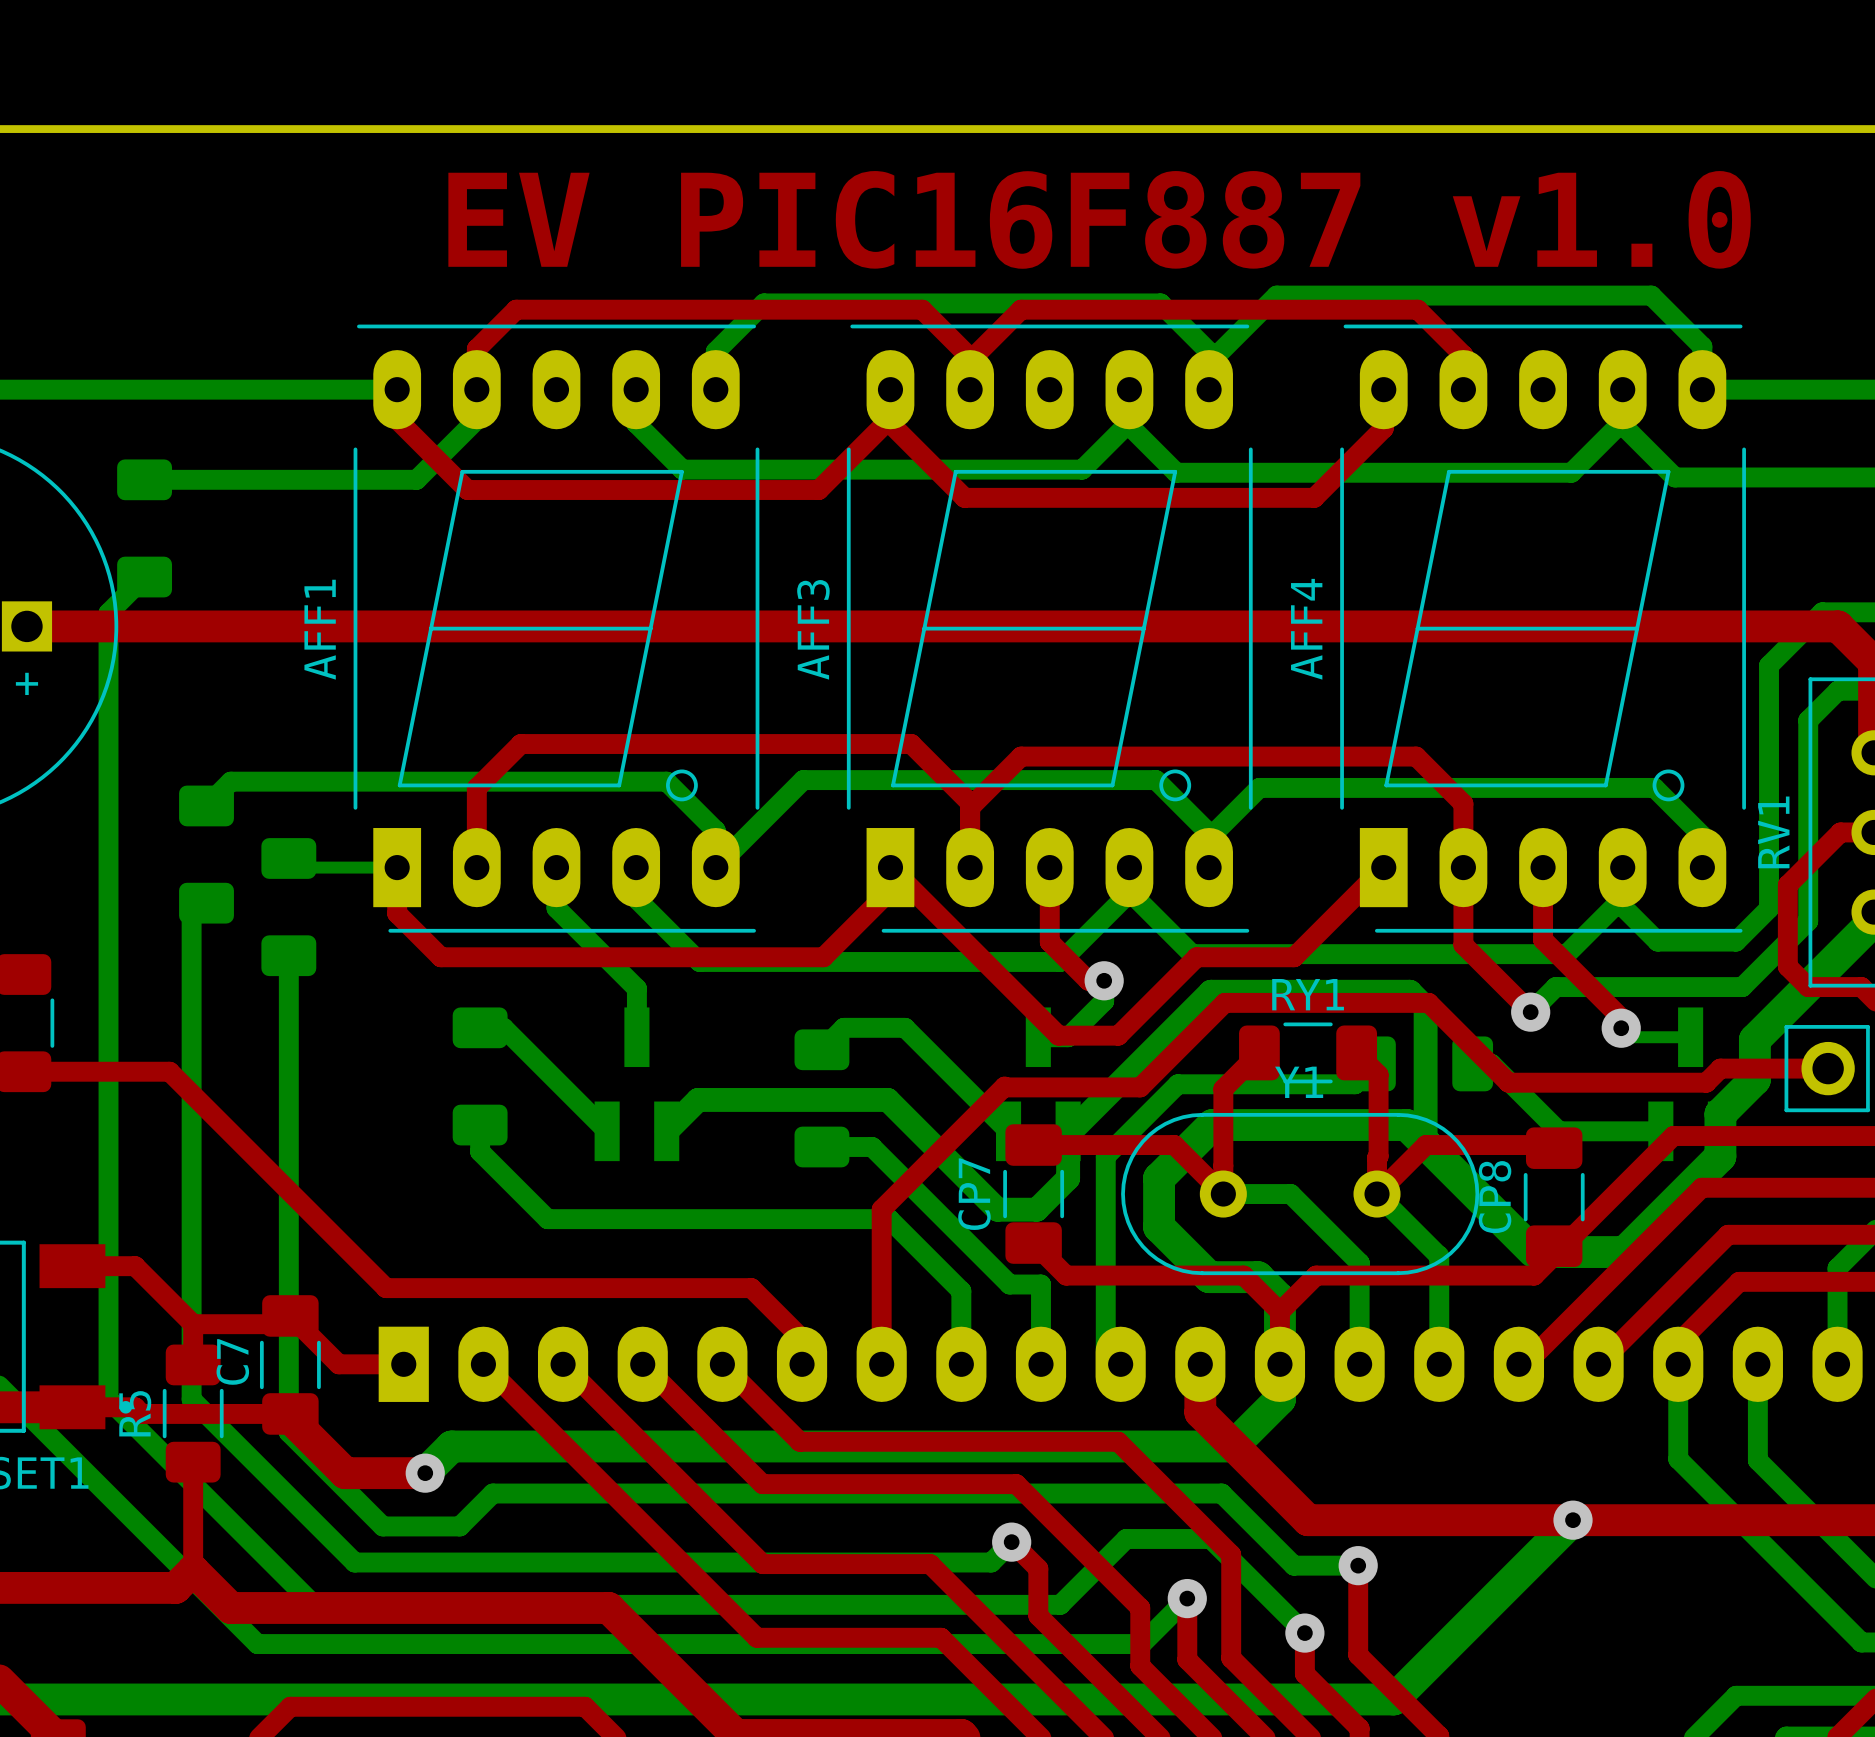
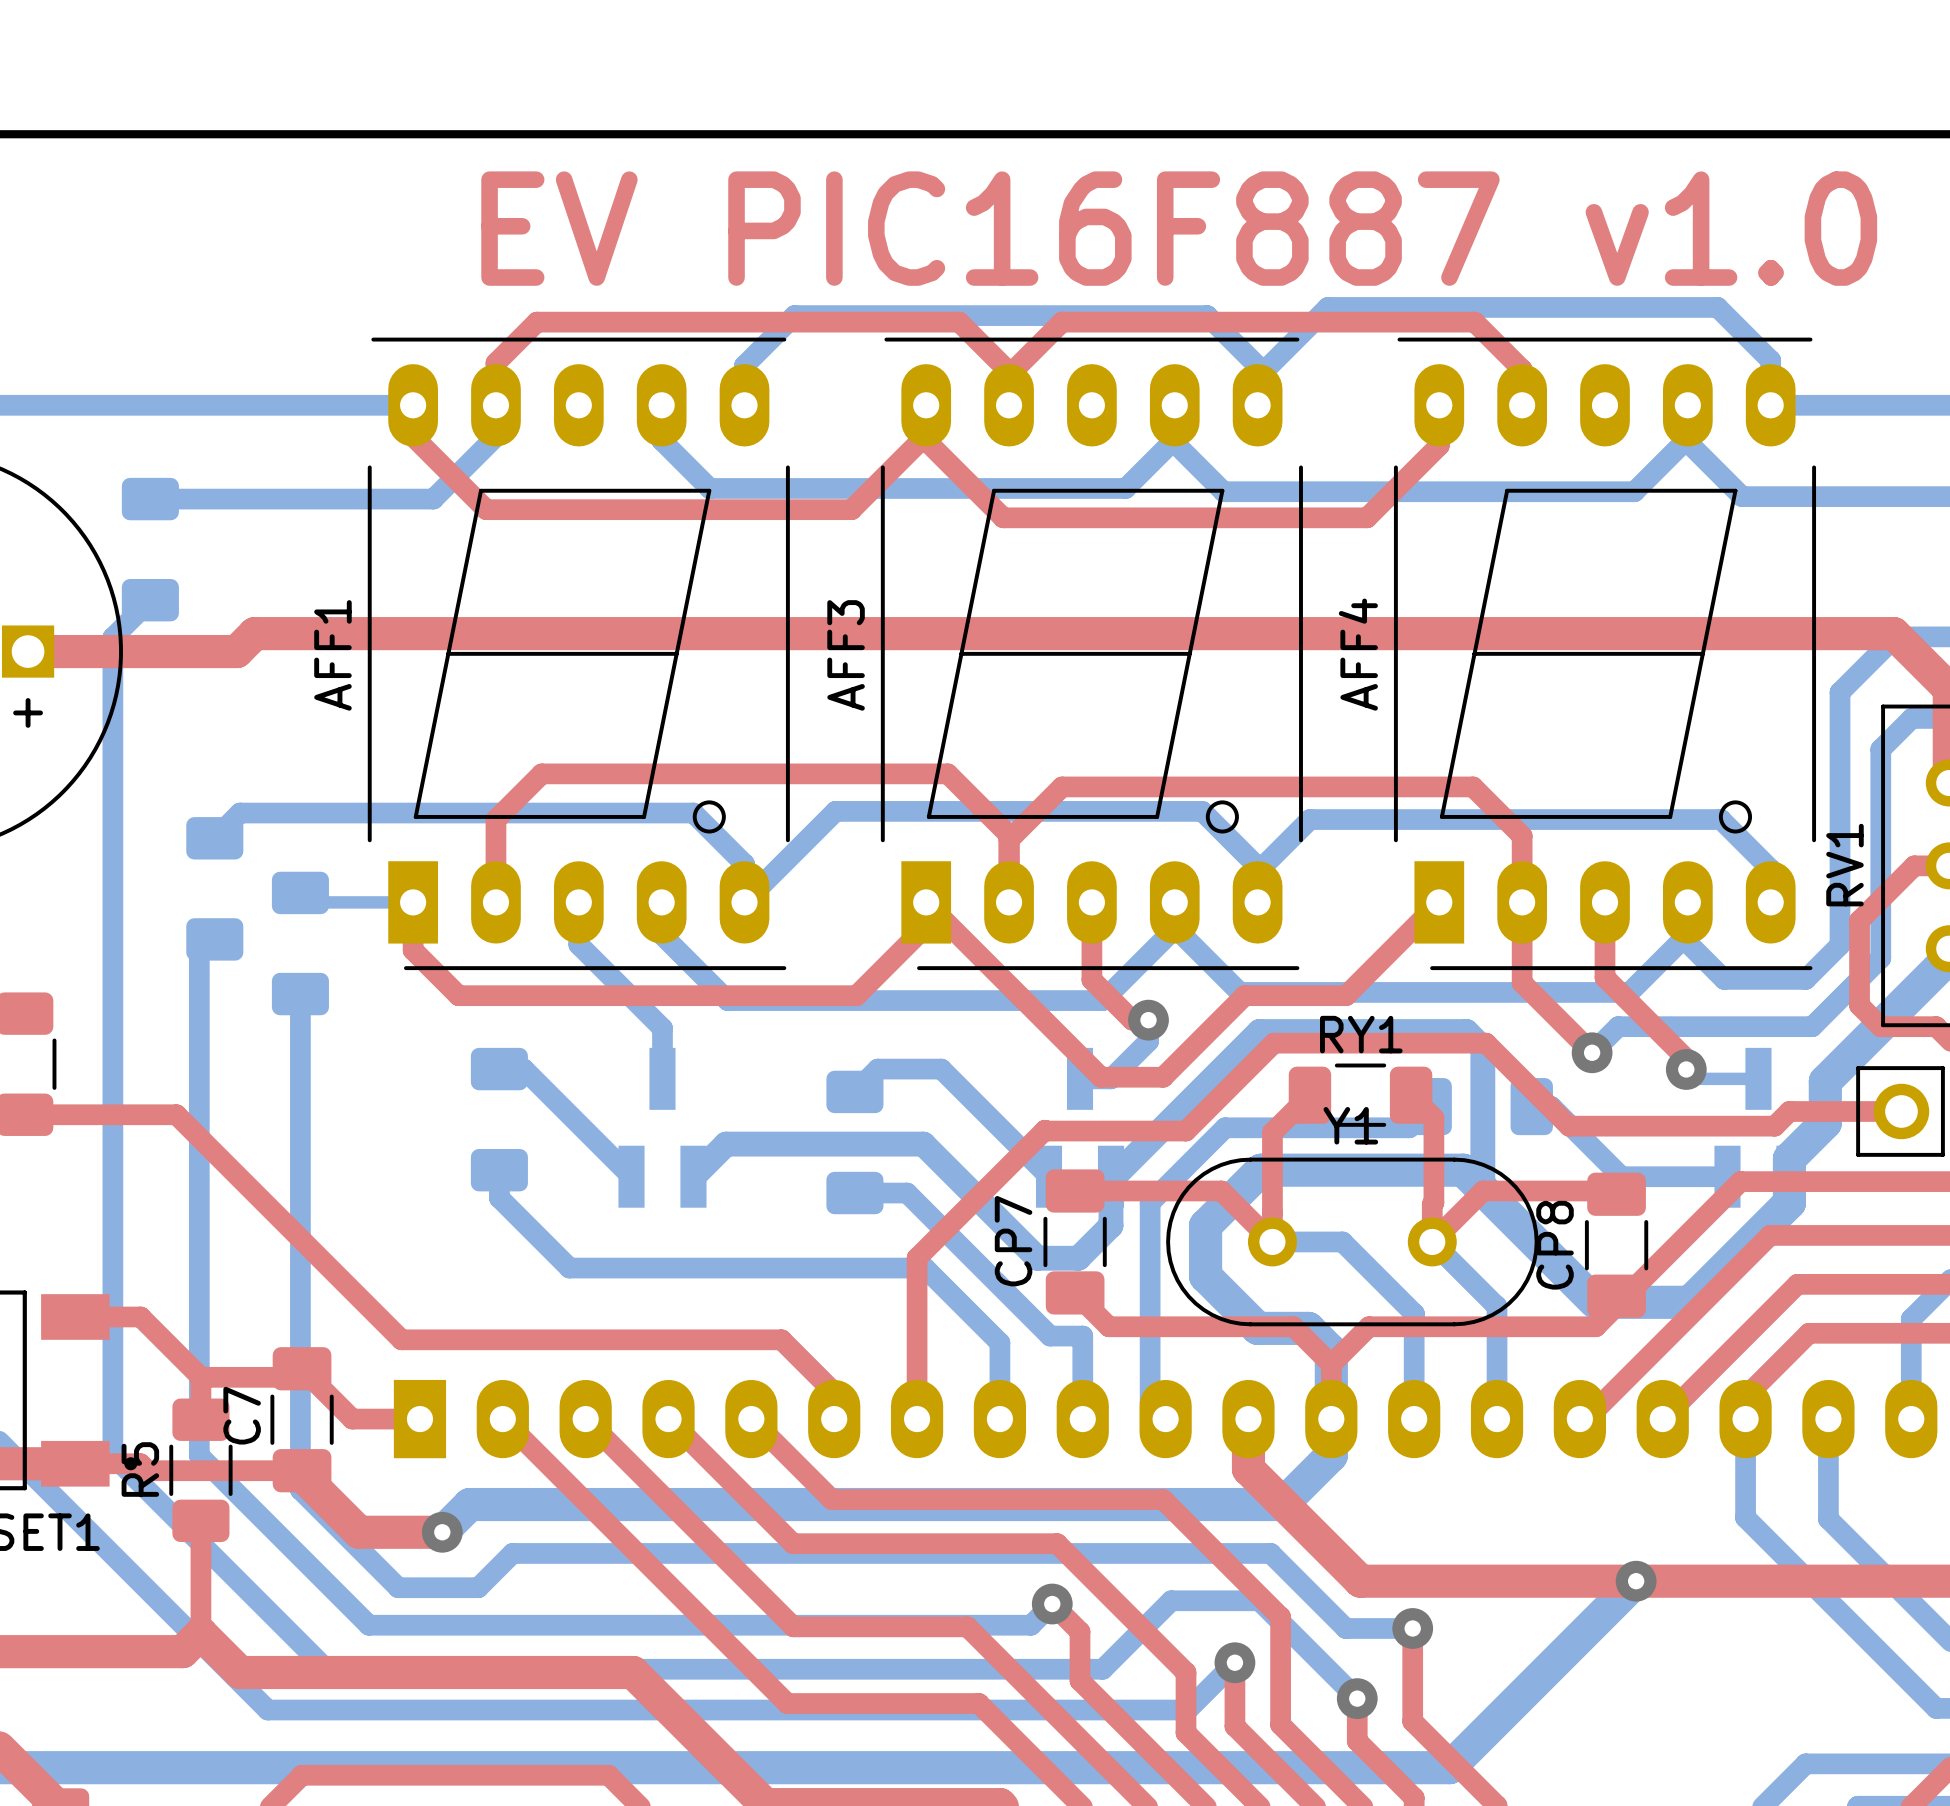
top track: (227, 626) (1838, 626) -> (236, 651) (254, 633) (1893, 633) (1911, 651)

